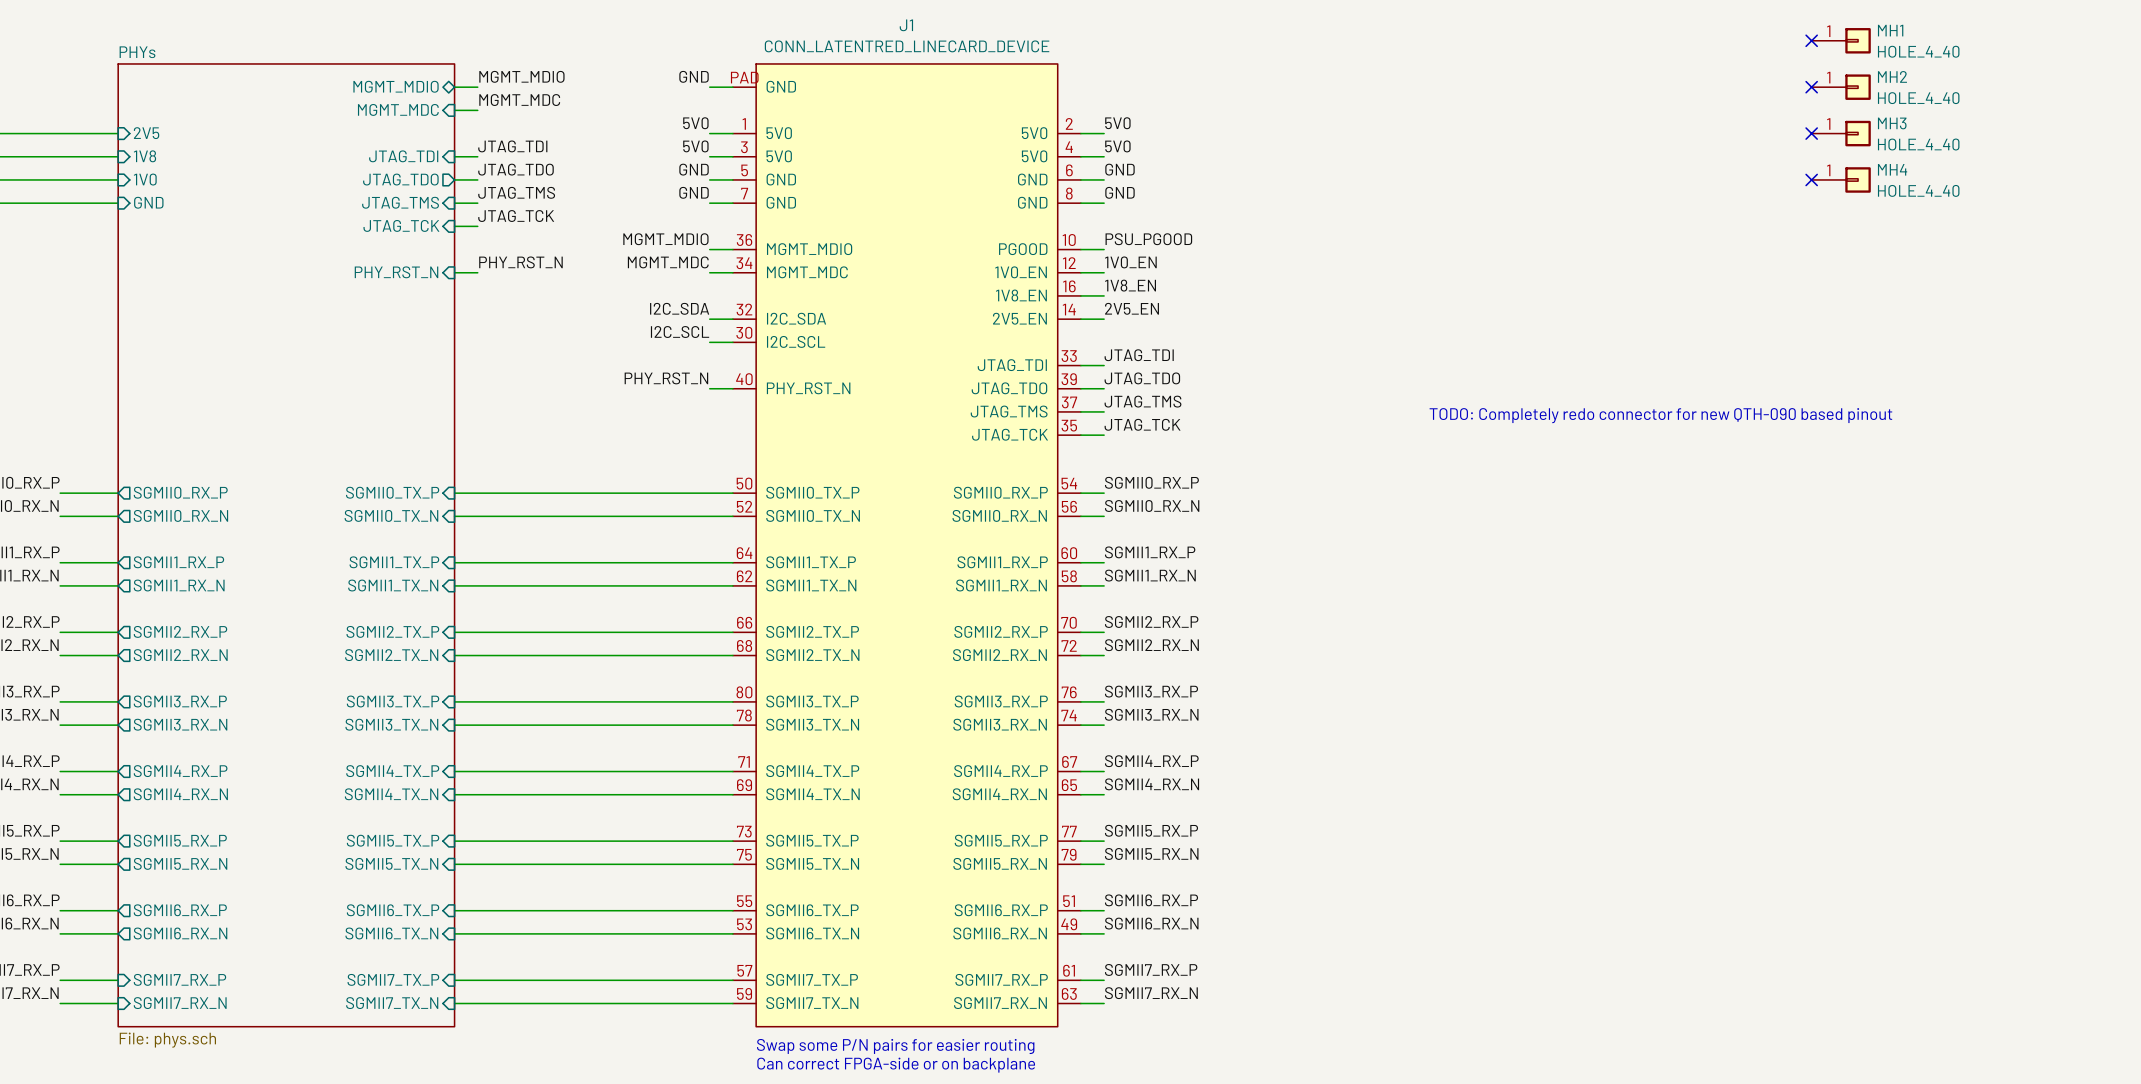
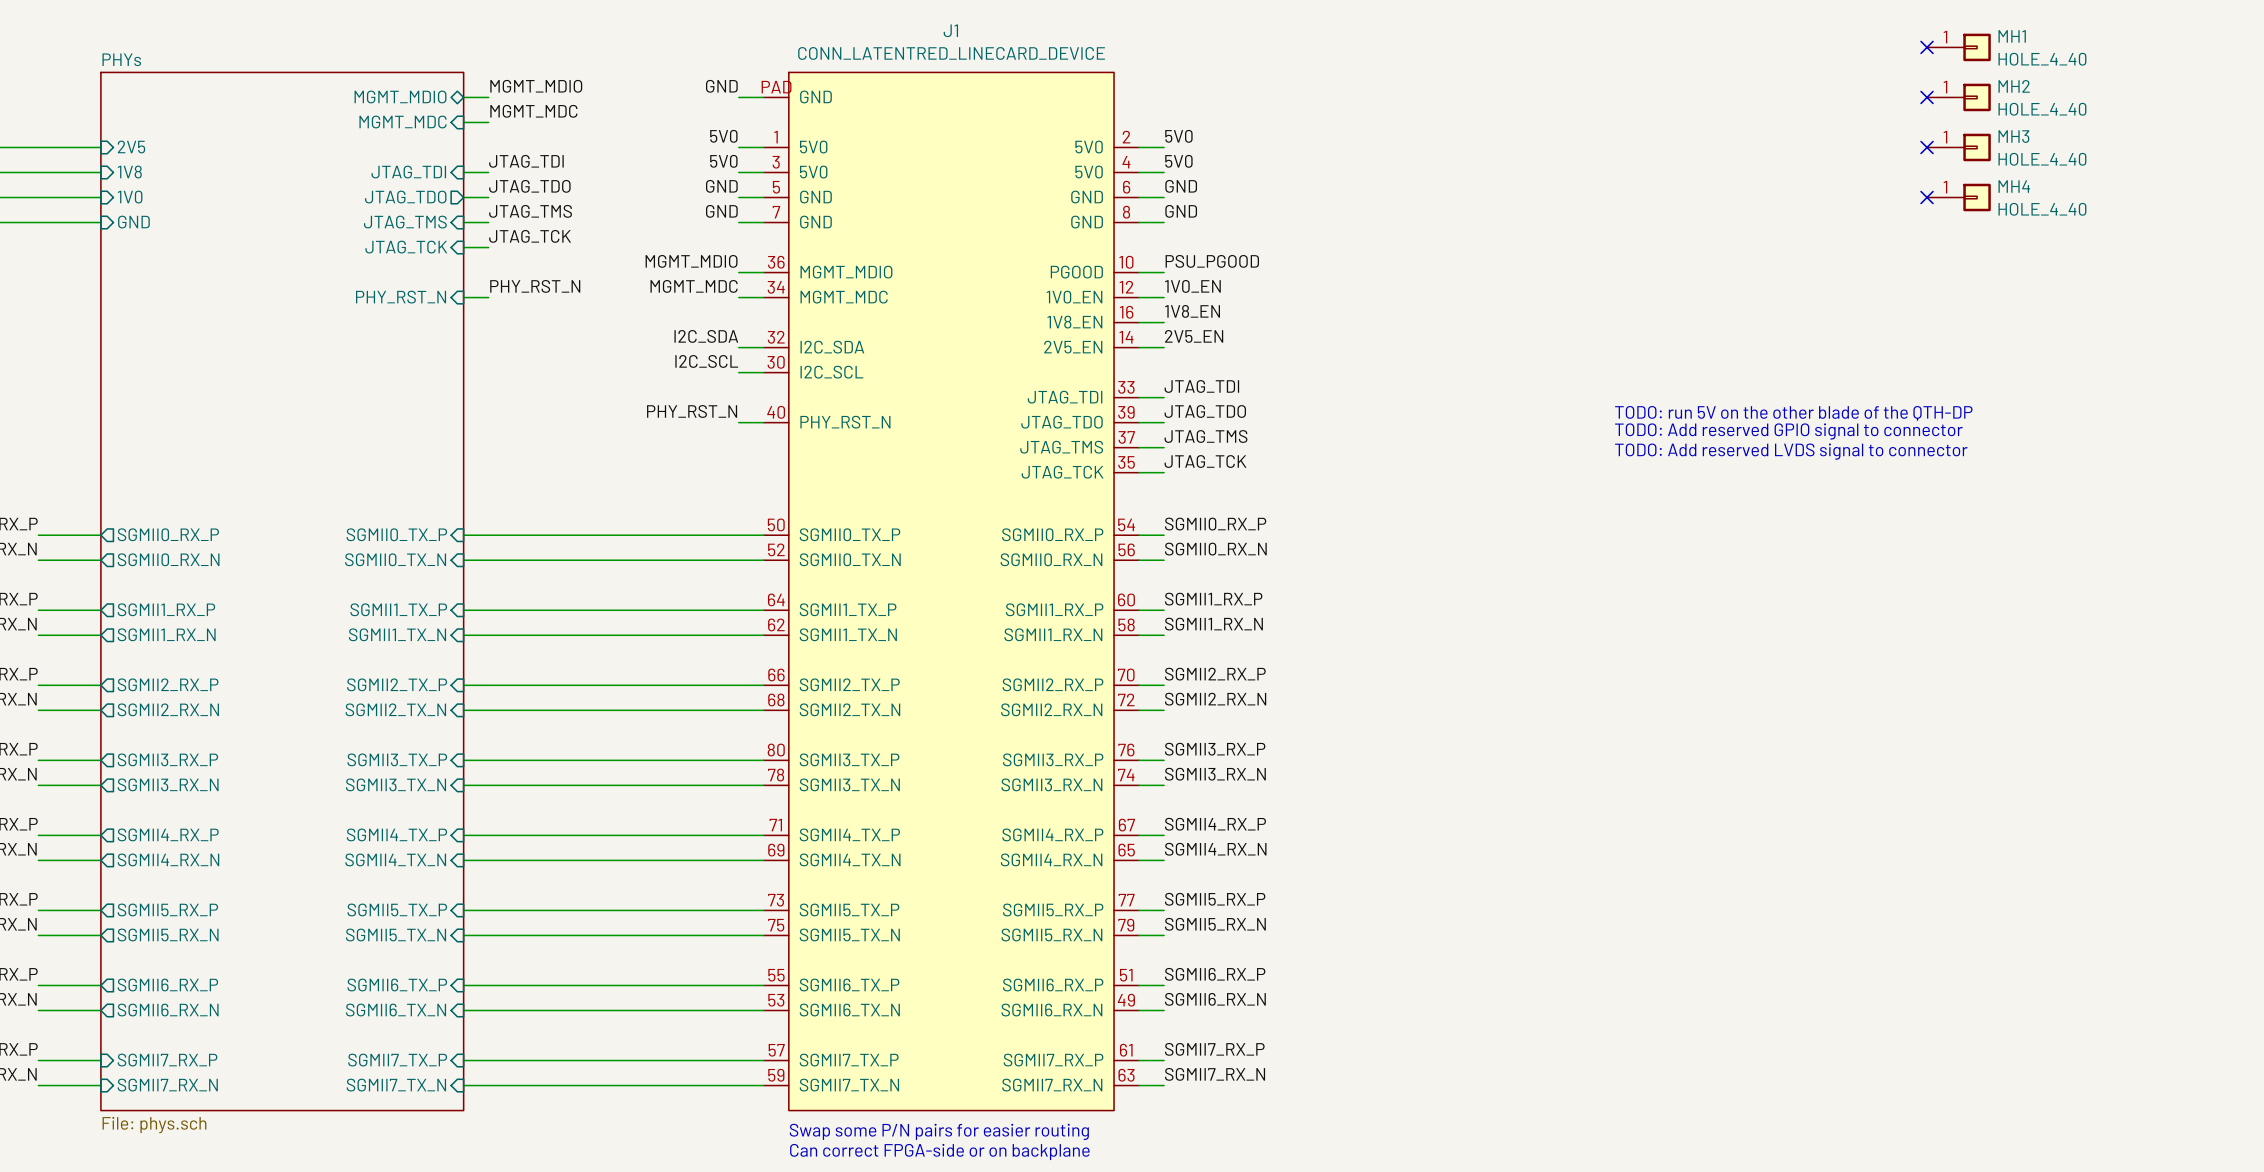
text: none -> TODO: run 5V on the other blade of the QTH-DP (1793, 413)
text: none -> TODO: Add reserved GPIO signal to connector (1788, 431)
text: TODO: Completely redo connector for new QTH-090 based pinout (1660, 415) -> none
text: none -> TODO: Add reserved LVDS signal to connector (1791, 451)

